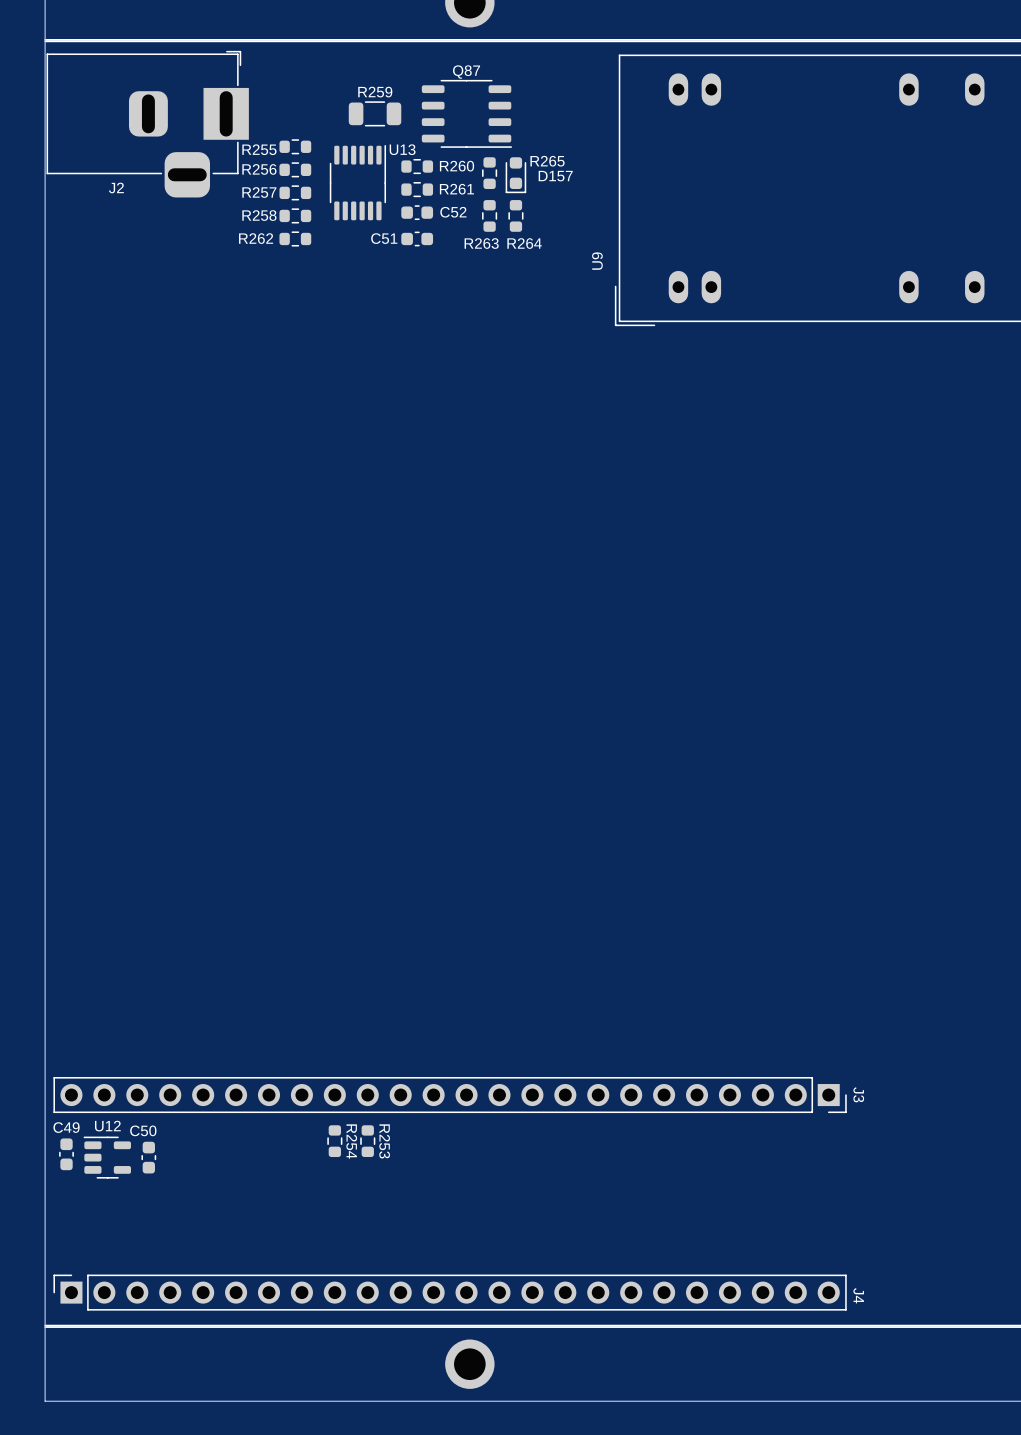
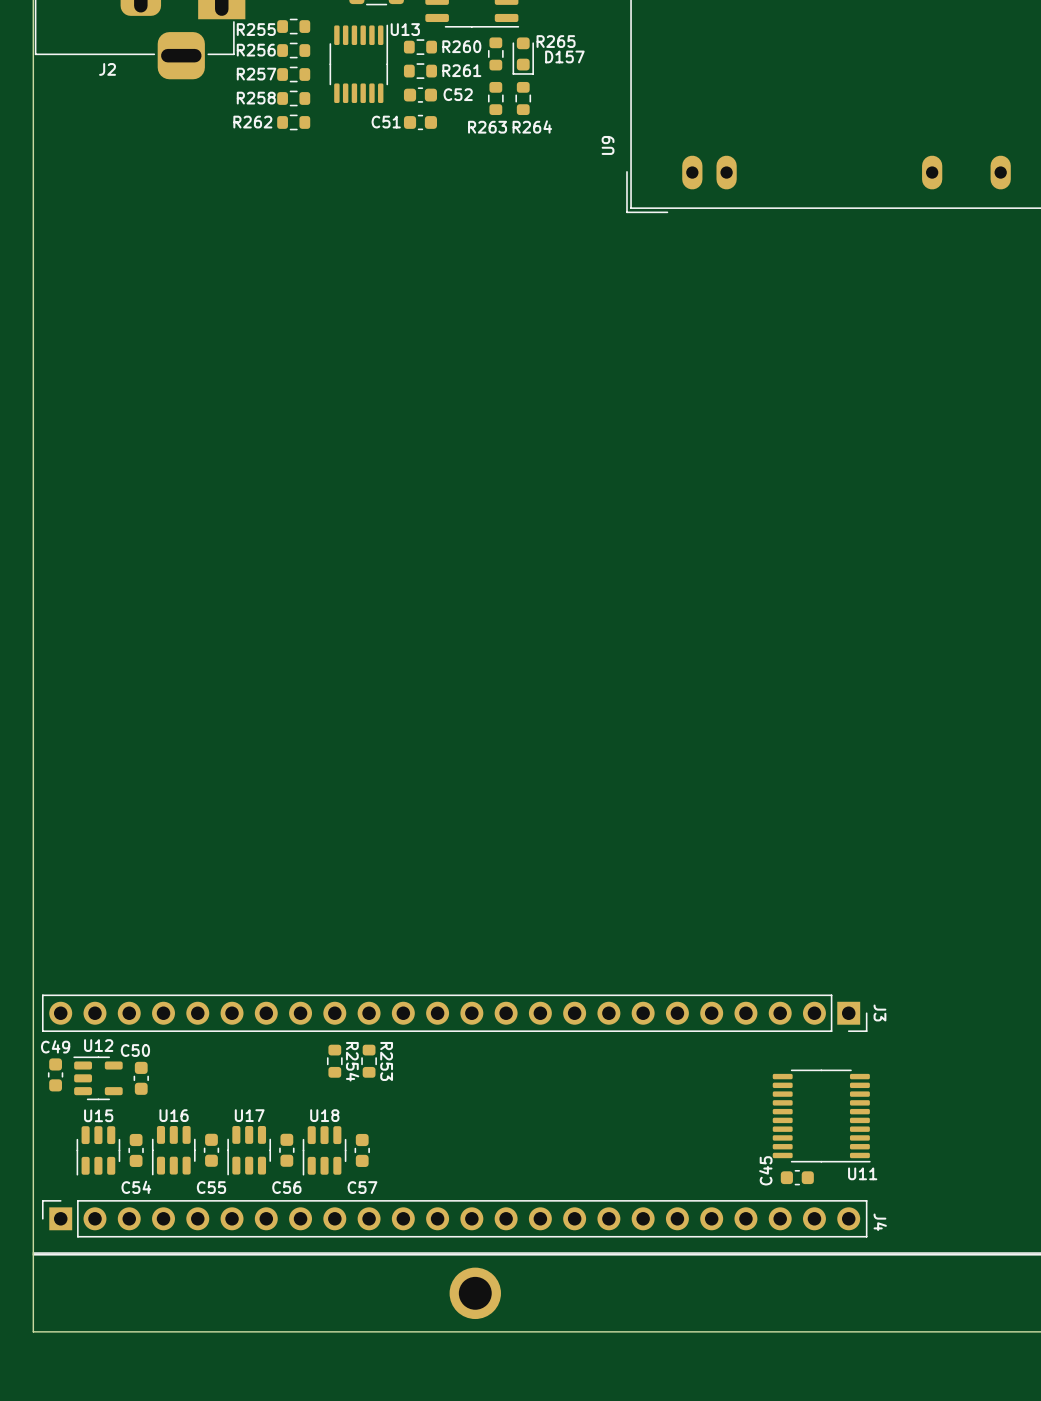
U11: none -> (821, 1116)
C54: none -> (136, 1150)
C55: none -> (211, 1150)
C56: none -> (286, 1150)
C57: none -> (362, 1150)
U15: none -> (98, 1150)
U16: none -> (173, 1150)
U17: none -> (249, 1150)
U18: none -> (324, 1150)
C45: none -> (797, 1177)

